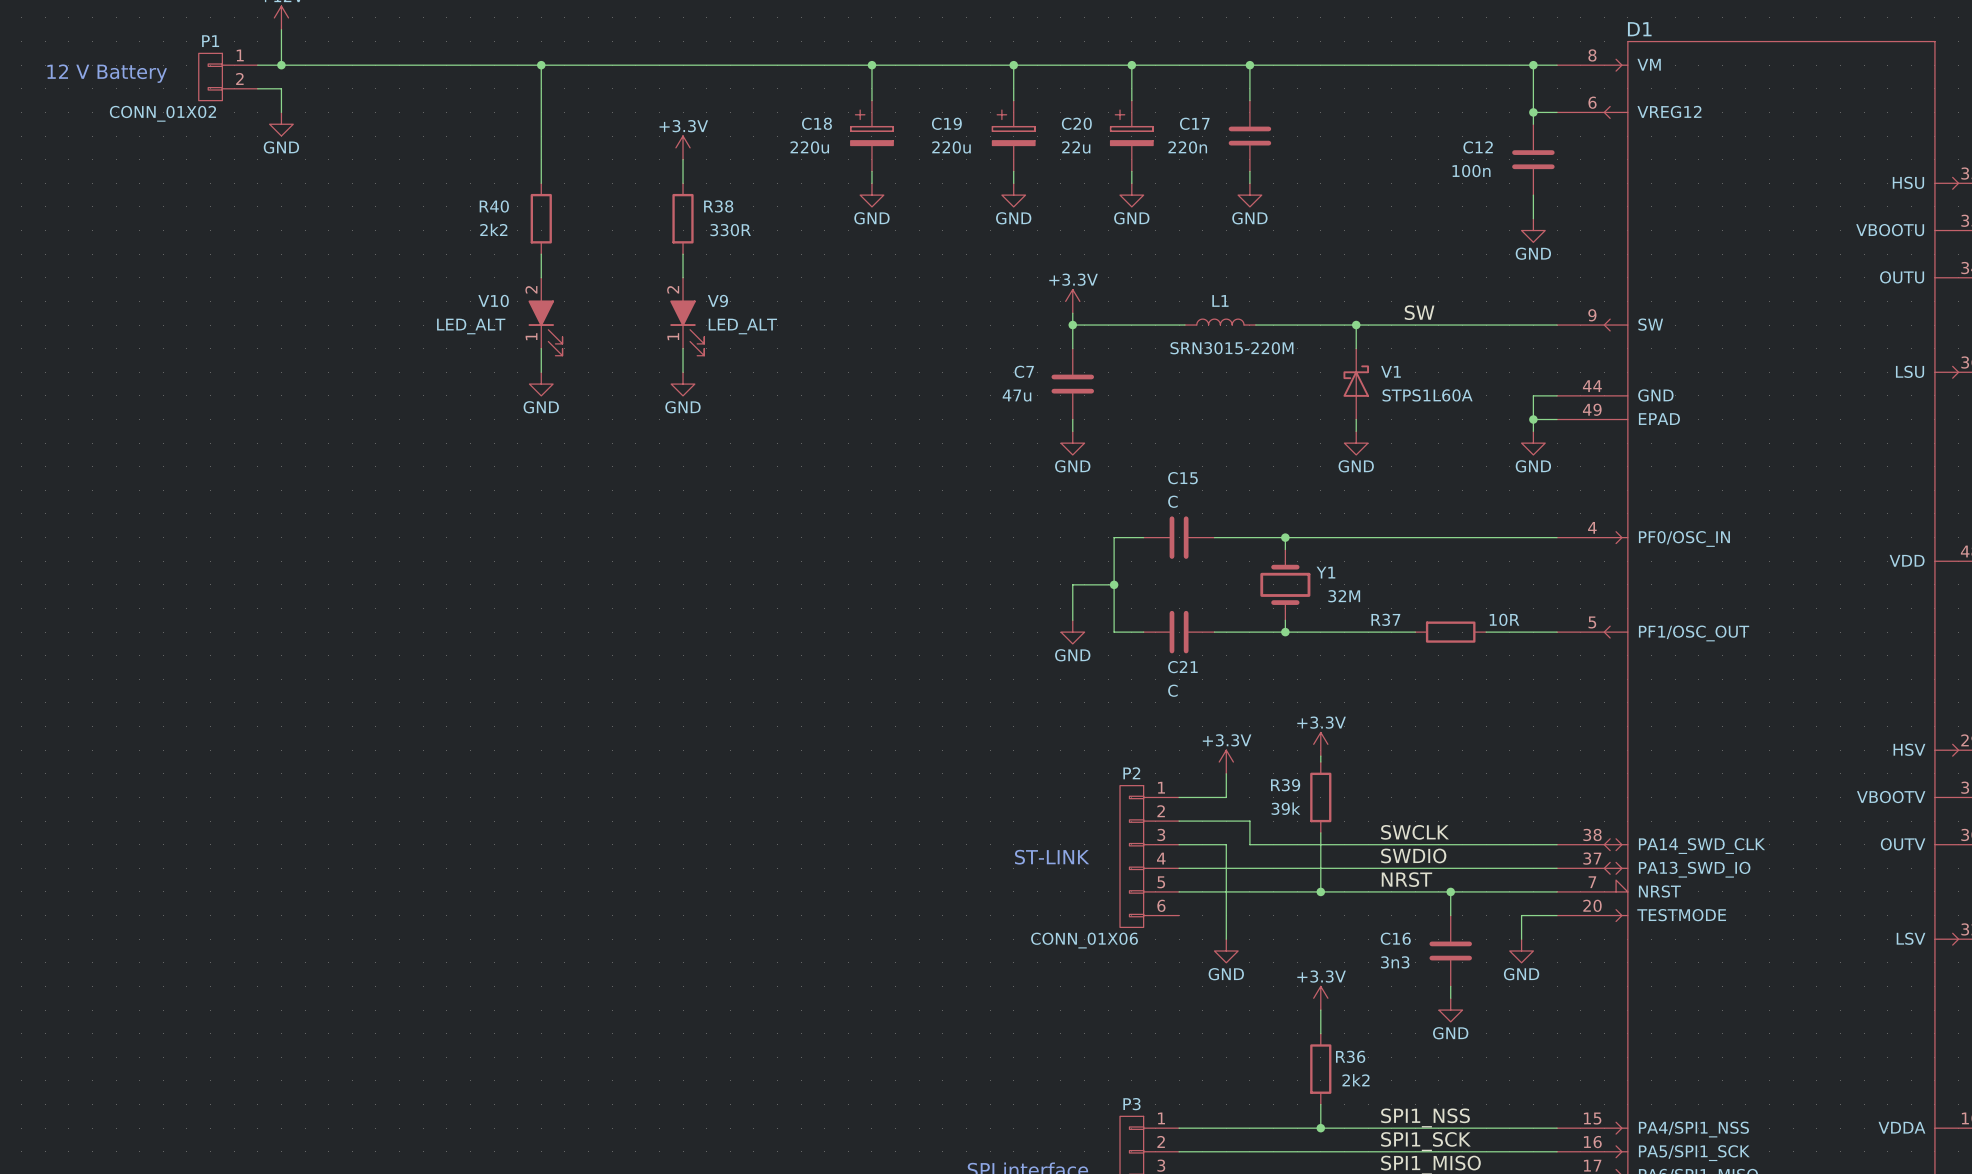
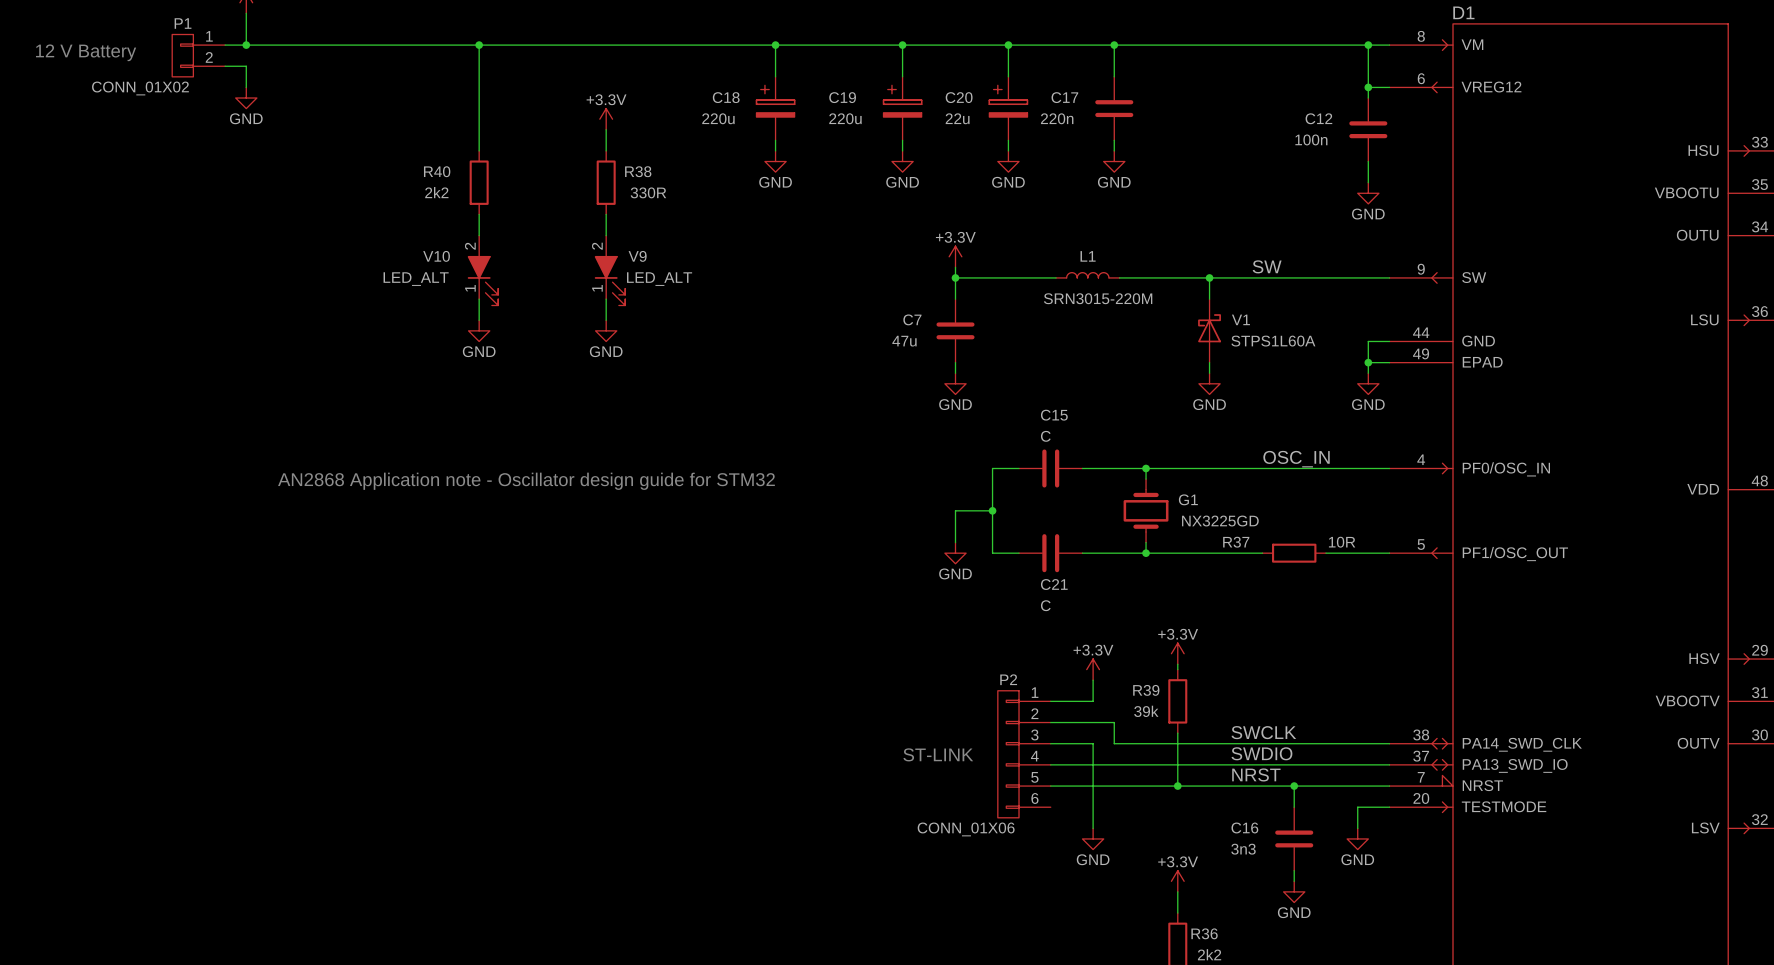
label: none -> OSC_IN (1296, 459)
text: none -> AN2868 Application note - Oscillator design guide for STM32 (526, 481)
Y1 name: Y1 (1325, 572) -> G1 (1188, 499)
Y1 value: 32M (1344, 596) -> NX3225GD (1220, 521)

